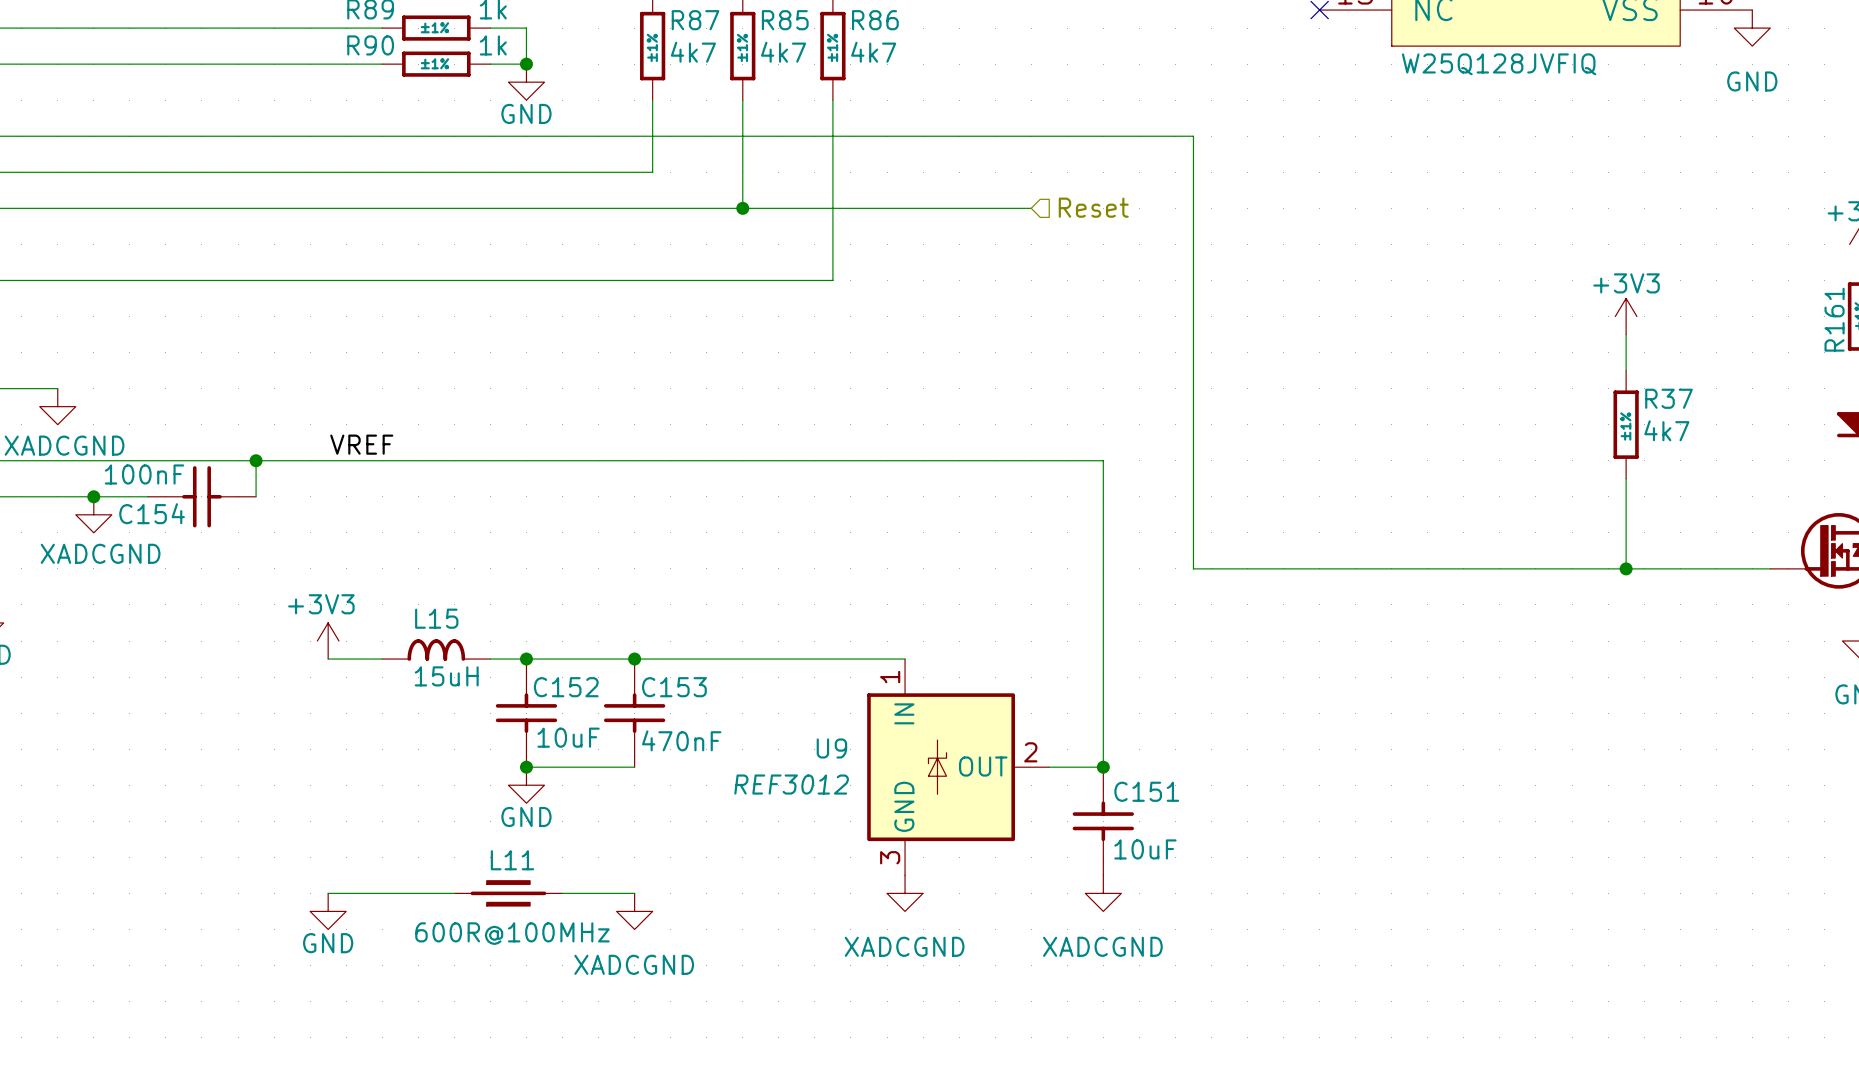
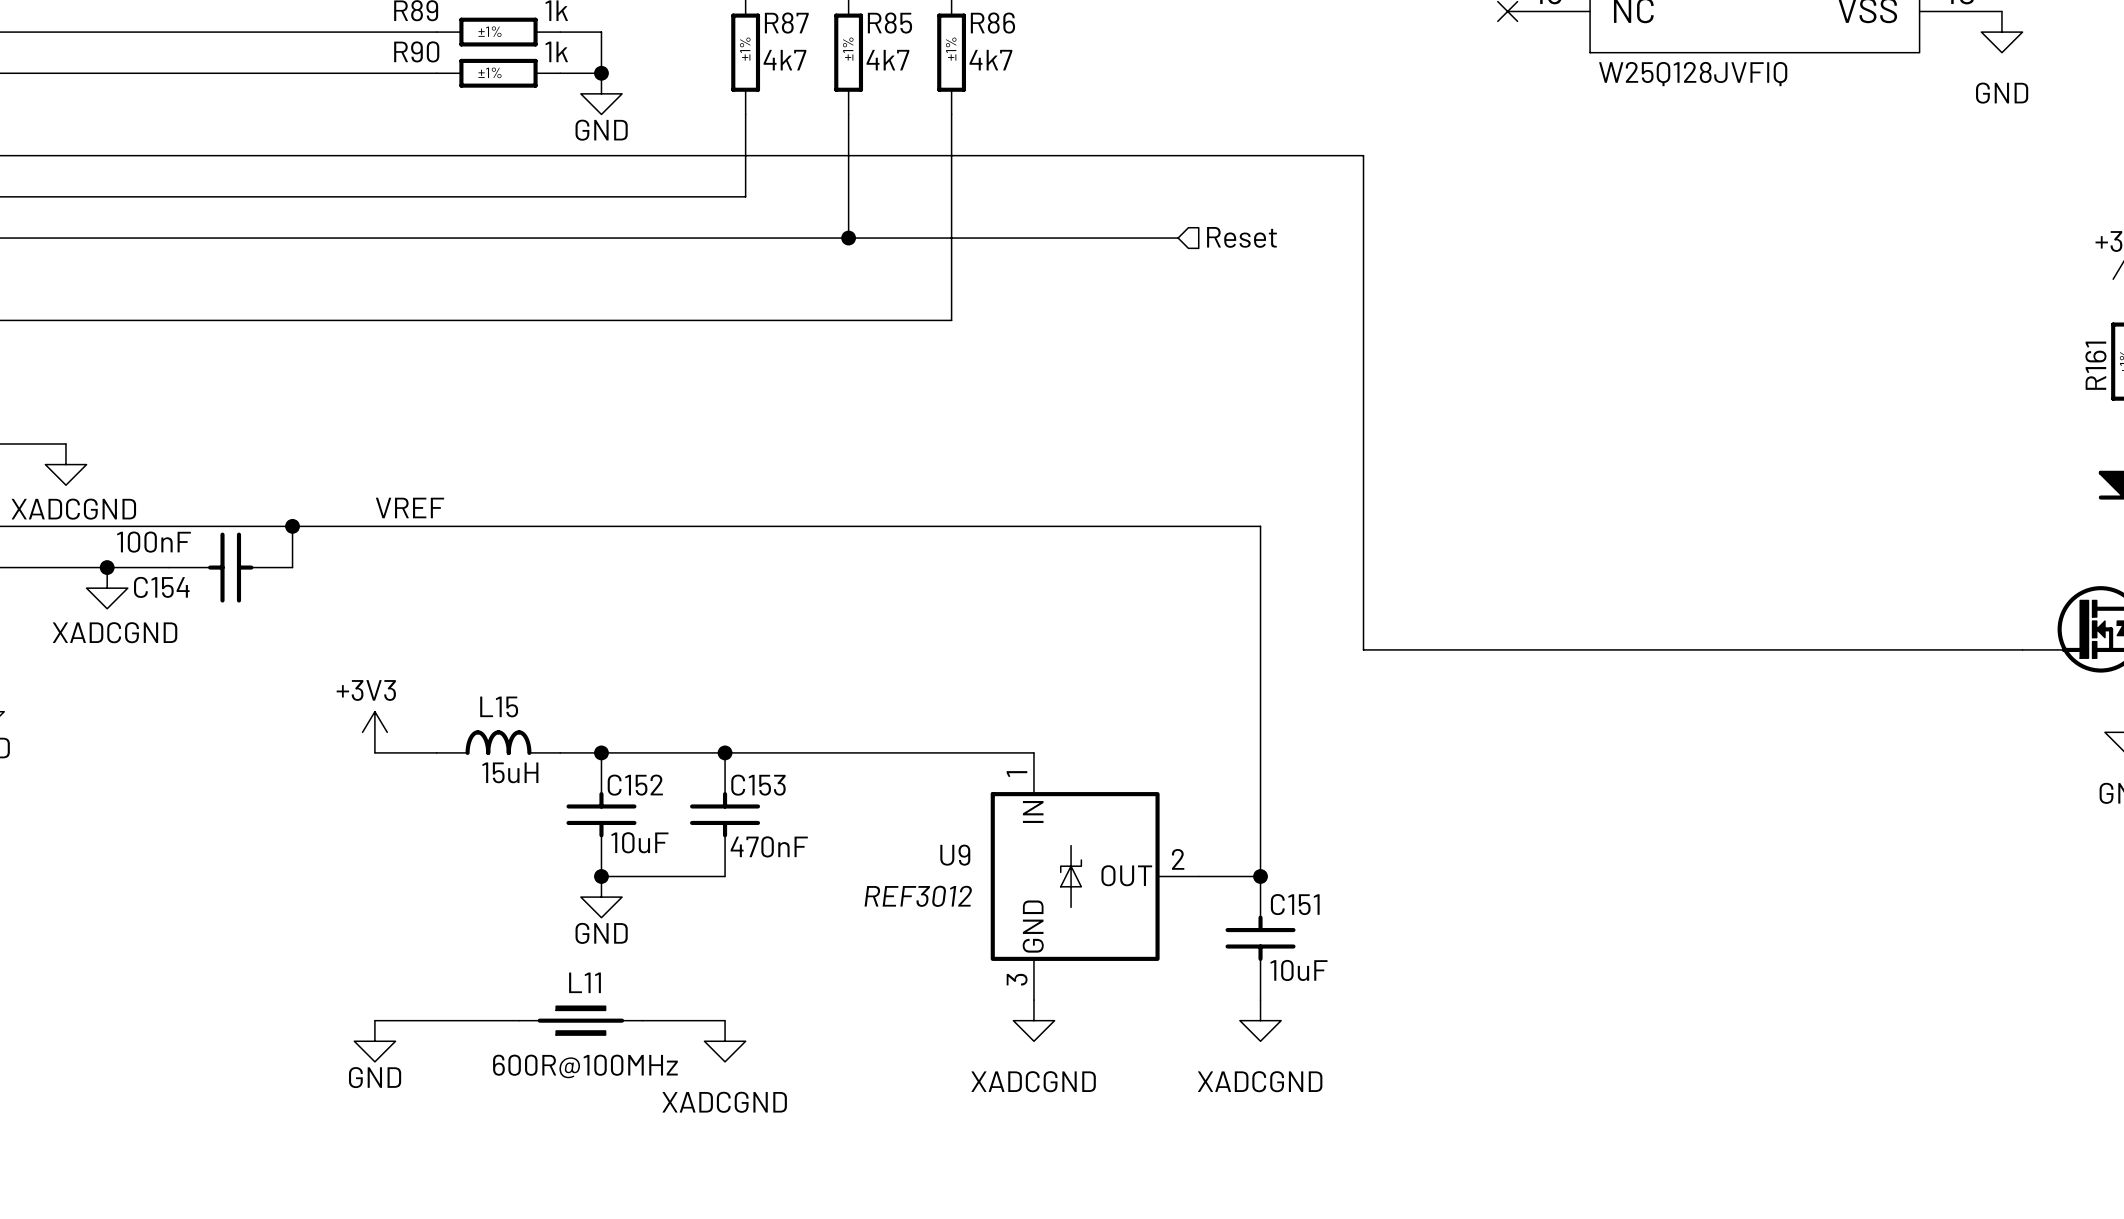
power symbol: +3V3 (1626, 316) -> none
wire: (1626, 334) (1626, 370) -> none
R37: (1626, 424) -> none
wire: (1626, 478) (1626, 568) -> none
junction: (1626, 568) -> none

